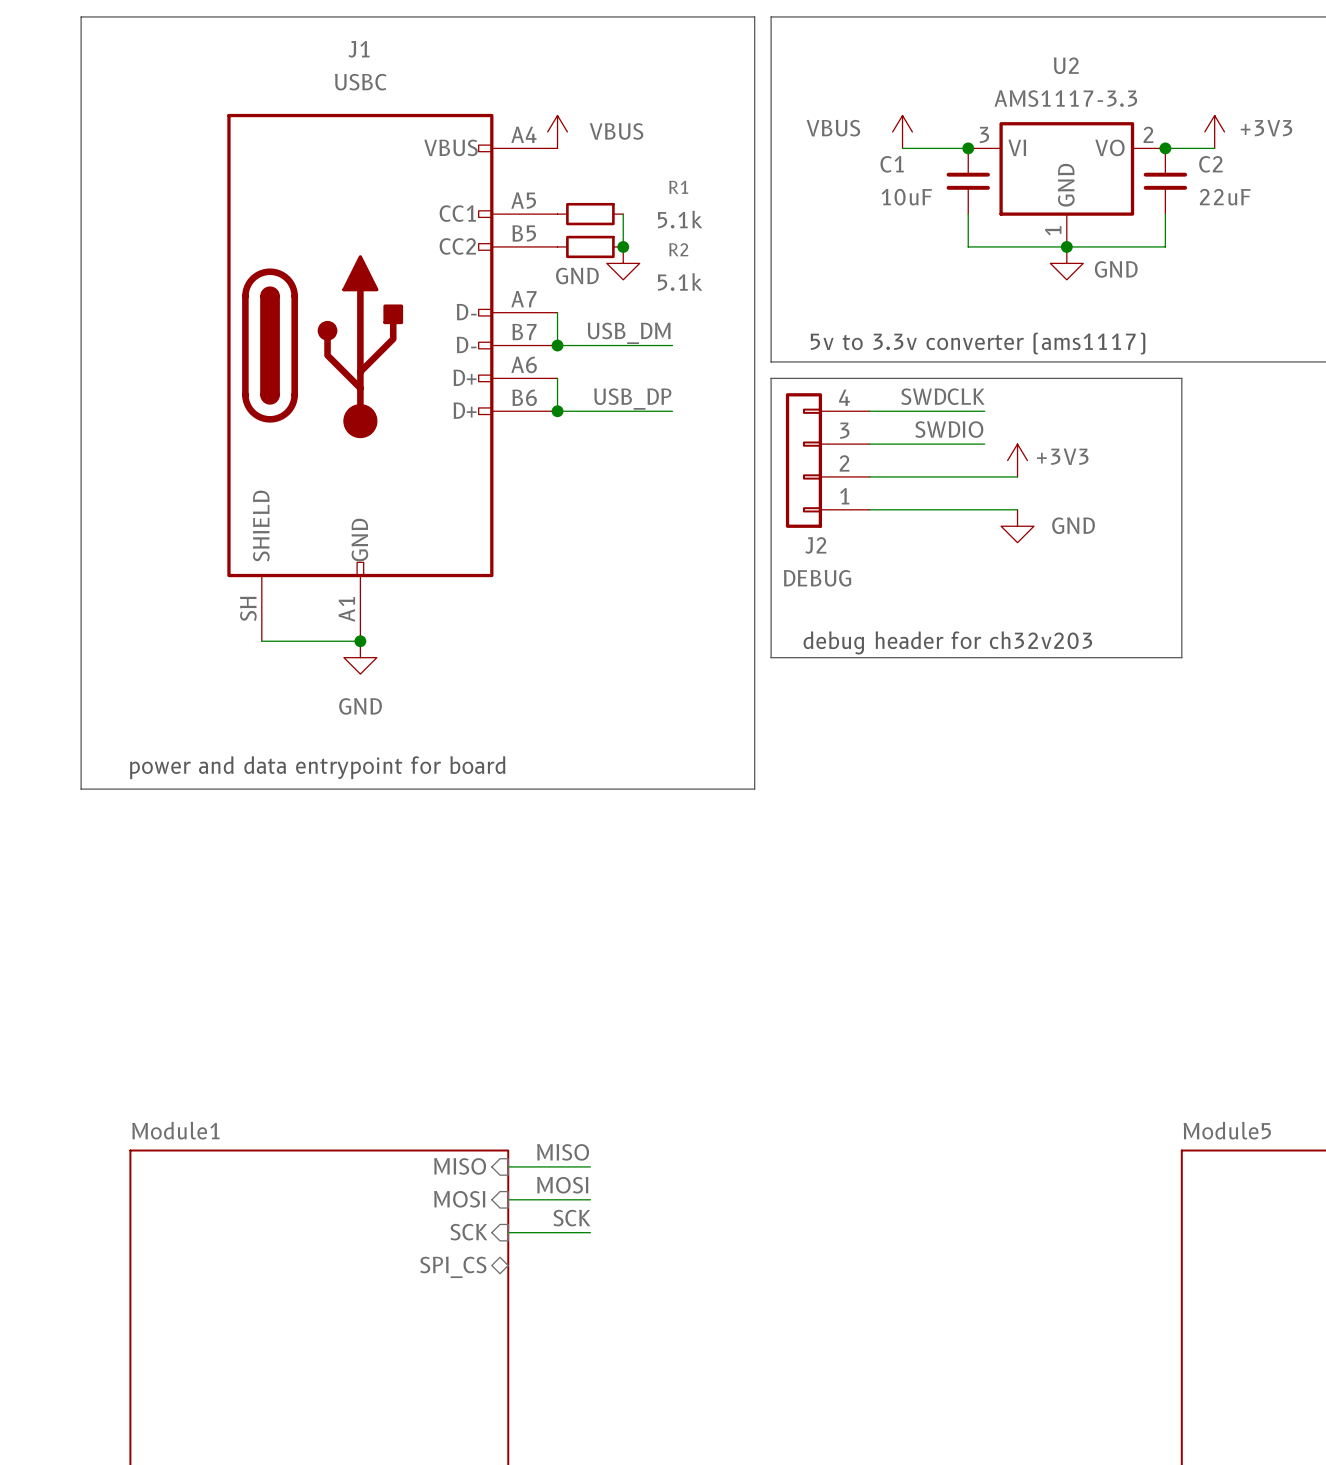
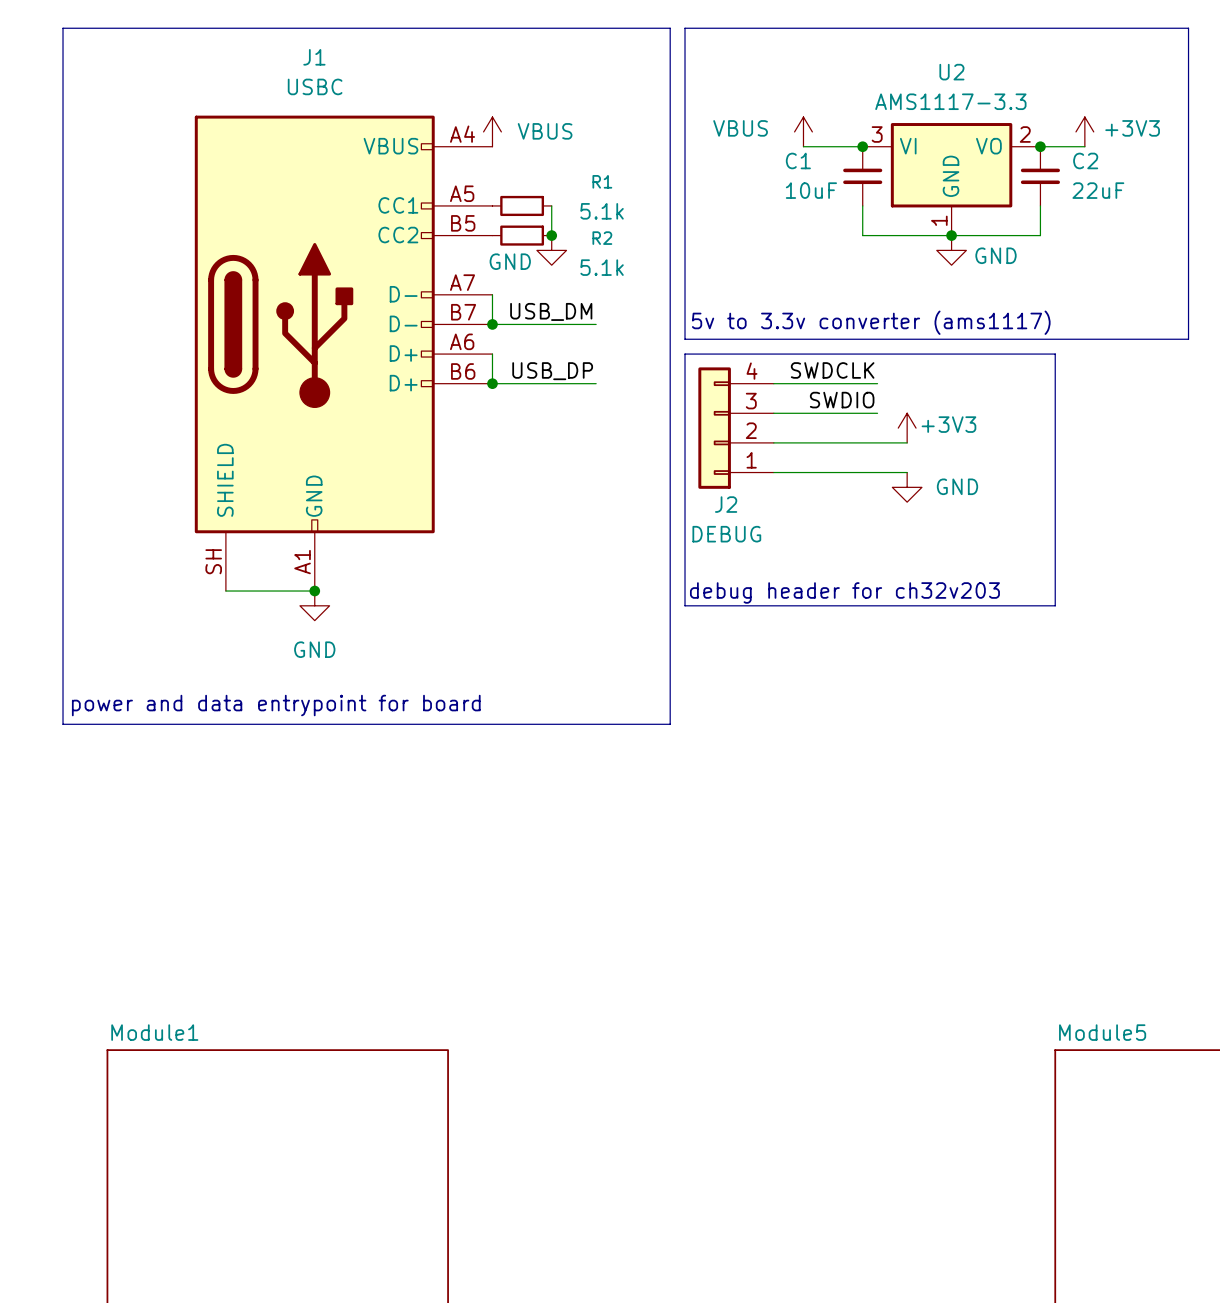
label: MISO (563, 1152) -> none
sheet pin: MISO (460, 1166) -> none
wire: (508, 1166) (590, 1166) -> none
label: MOSI (562, 1185) -> none
sheet pin: MOSI (459, 1199) -> none
wire: (508, 1199) (590, 1199) -> none
label: SCK (571, 1218) -> none
sheet pin: SCK (468, 1232) -> none
wire: (508, 1232) (590, 1232) -> none
sheet pin: SPI_CS (453, 1267) -> none

